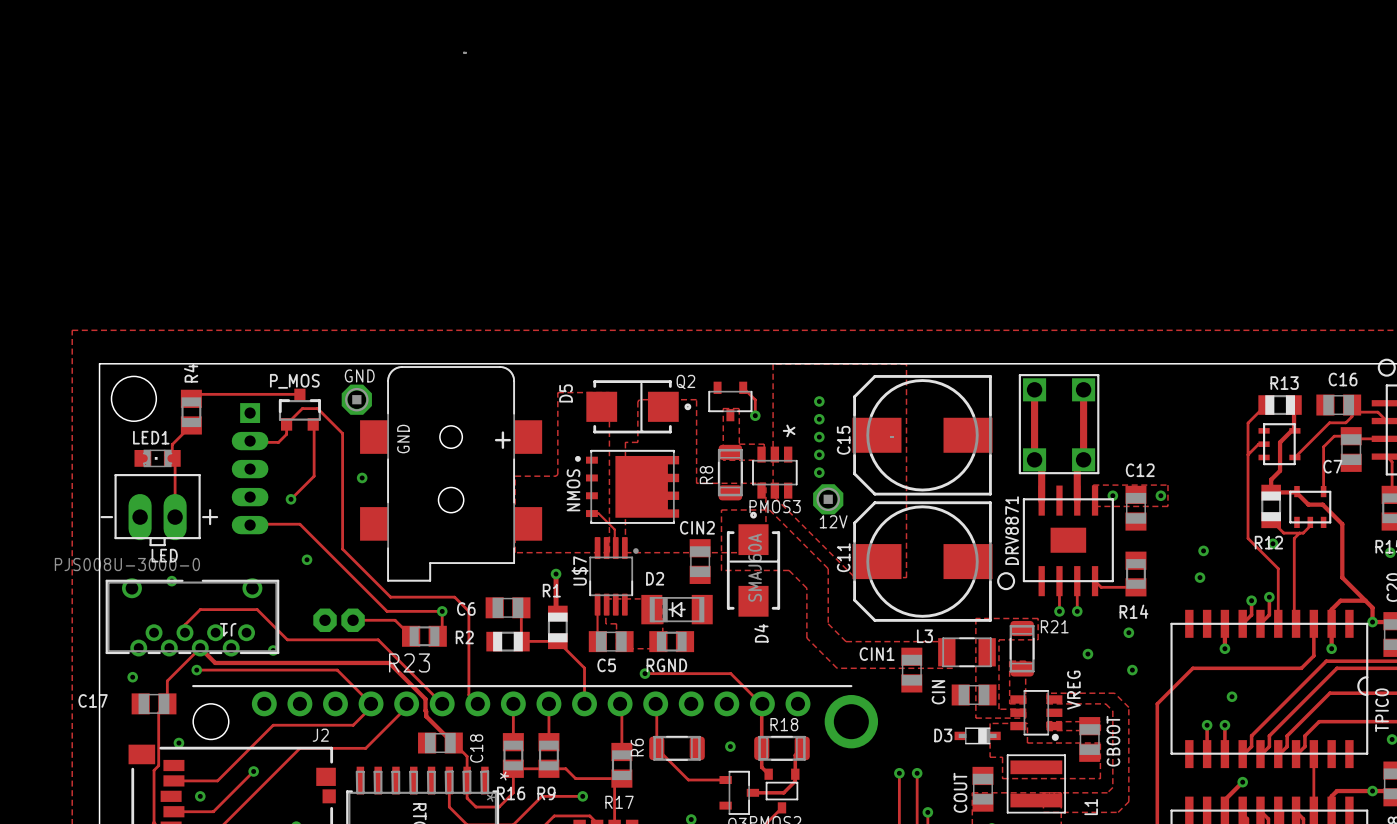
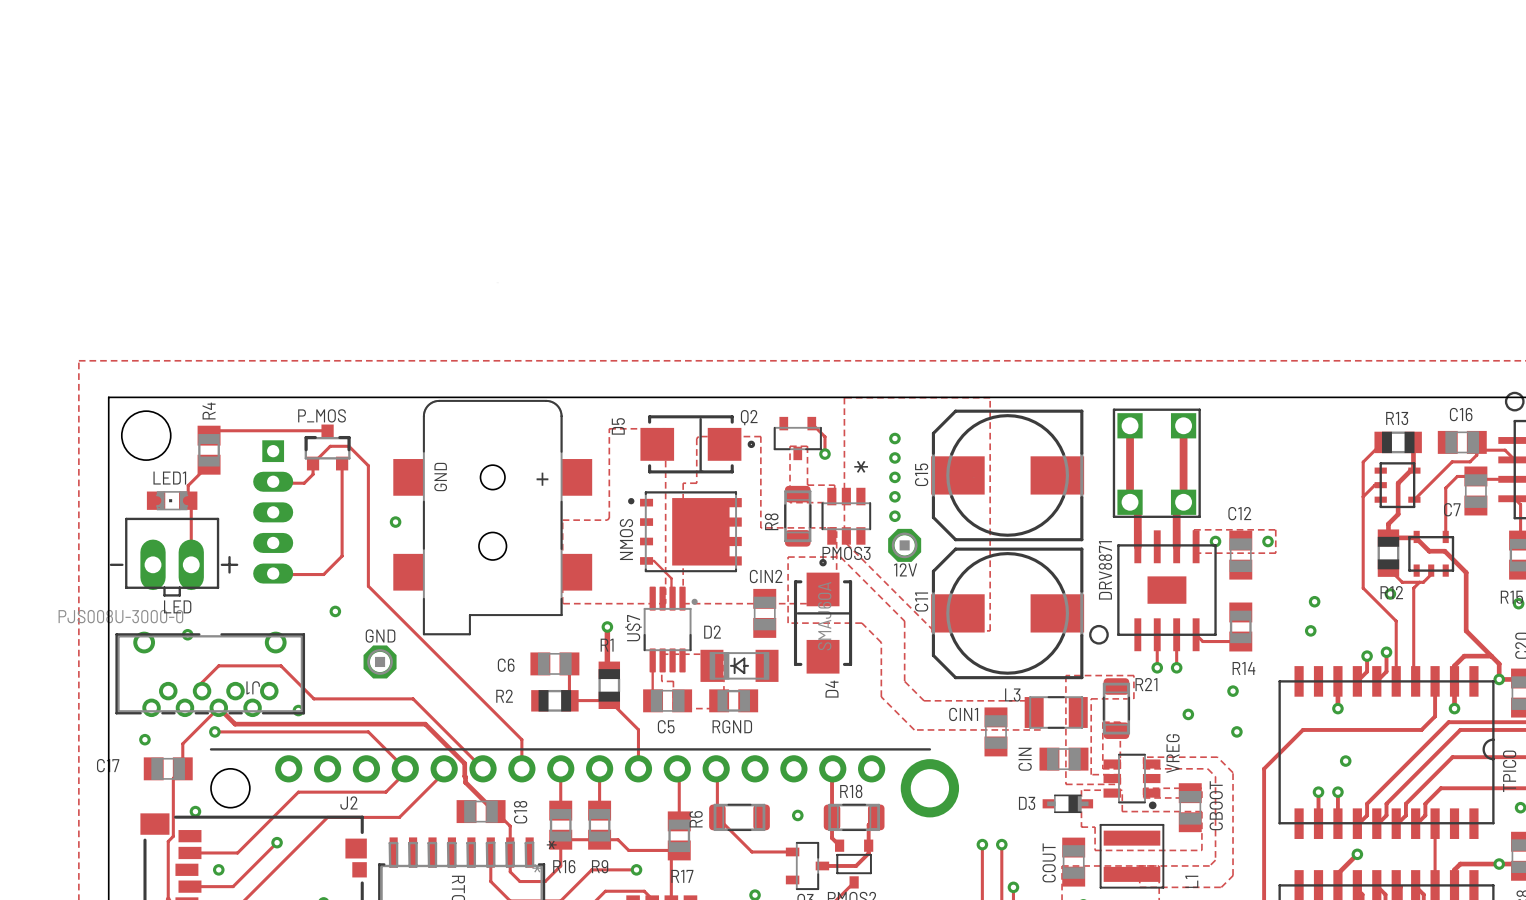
GND position: (356, 399) -> (380, 661)
track: (317, 408) (342, 433) (342, 549) (390, 597) (454, 597) (468, 611) (468, 694) (477, 703) -> (347, 446) (368, 465) (368, 586) (521, 739) (521, 768)
track: (313, 424) (314, 476) (291, 499) -> (342, 463) (342, 556) (323, 574) (273, 573)
via: (291, 499) -> none
track: (250, 525) (299, 524) (387, 611) (442, 611) (442, 631) (437, 636) -> none
via: (442, 611) -> none
part: (339, 620) -> none
track: (353, 620) (395, 620) (411, 636) -> none
R23: (424, 636) -> none
track: (645, 673) (730, 673) (761, 704) -> none
via: (645, 673) -> none

